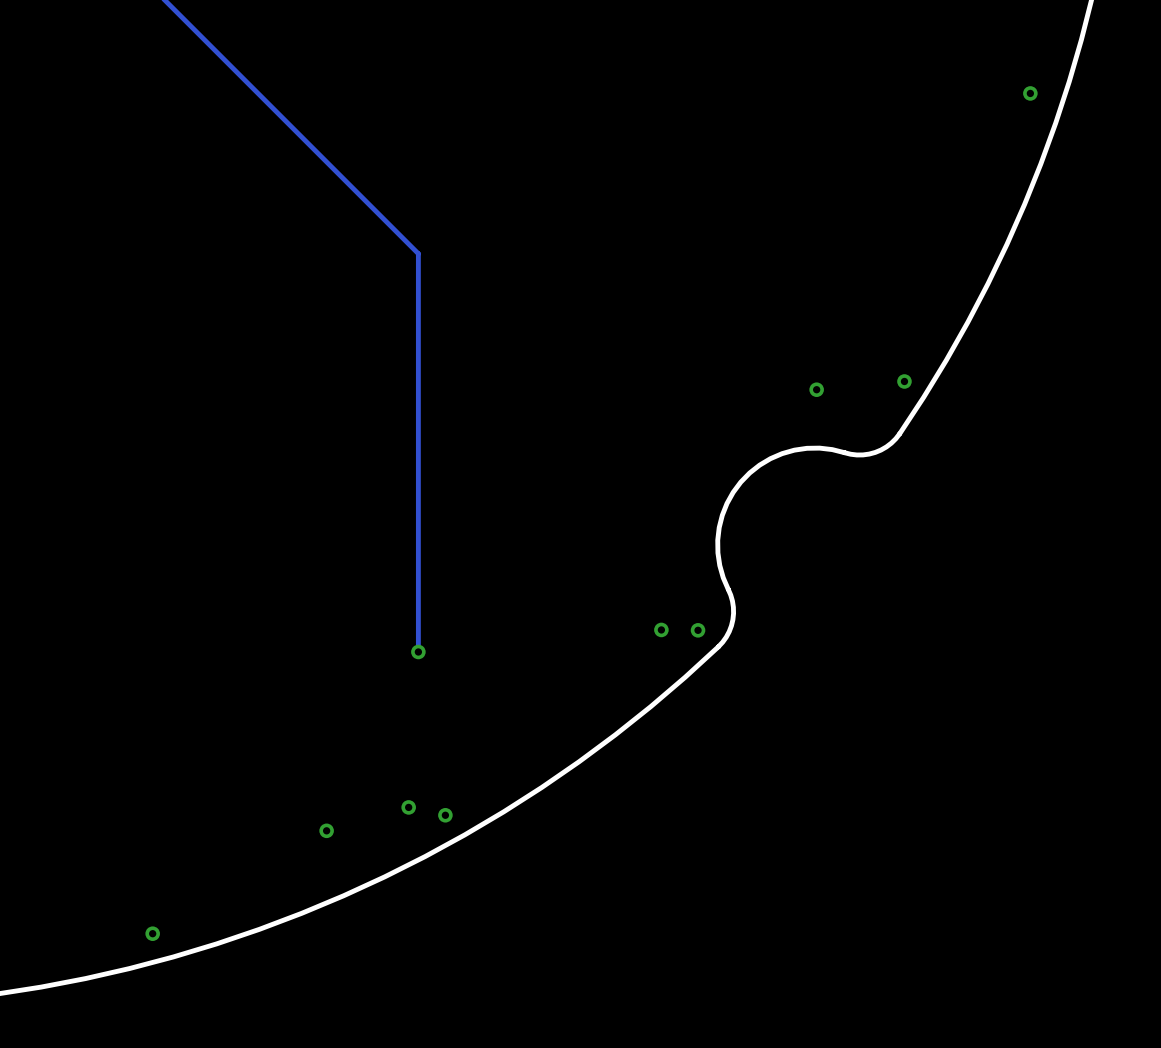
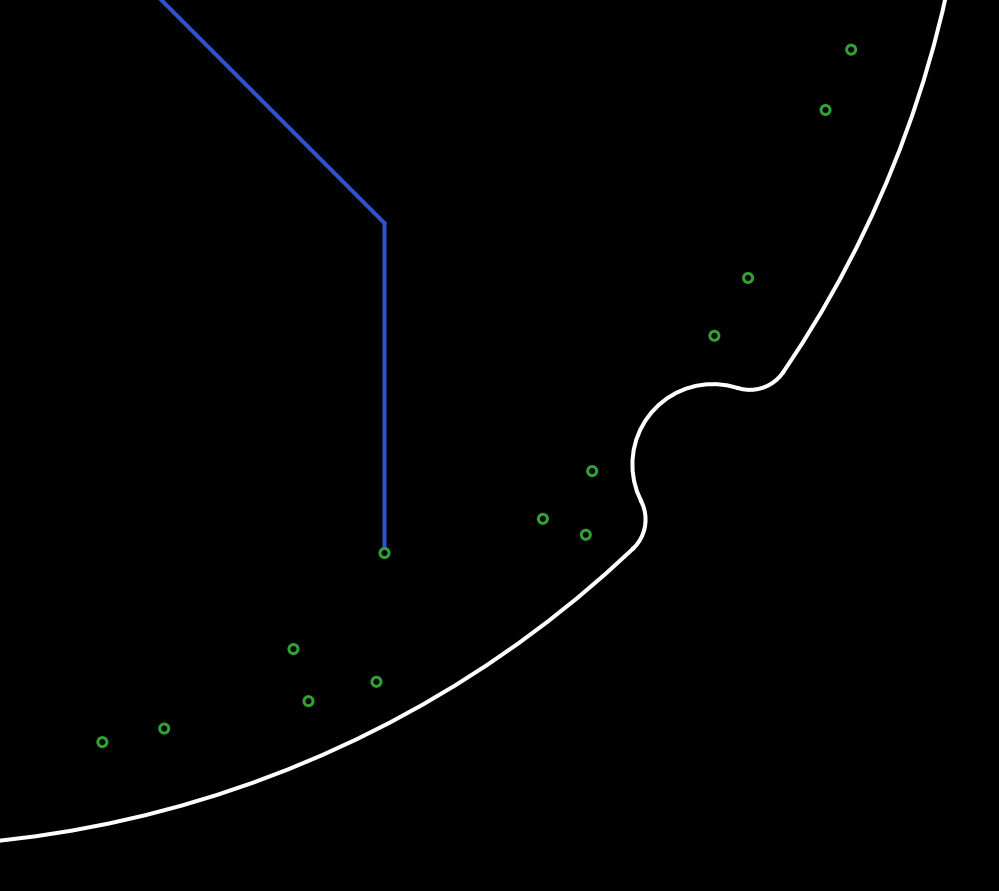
via: none -> (851, 49)
via: (1030, 93) -> none
via: none -> (825, 109)
via position: (904, 381) -> (748, 277)
via: none -> (592, 471)
via: none -> (542, 518)
via: (698, 630) -> none
via: none -> (293, 649)
via: (445, 815) -> none
via: none -> (164, 728)
via: none -> (102, 742)
via: (152, 933) -> none

